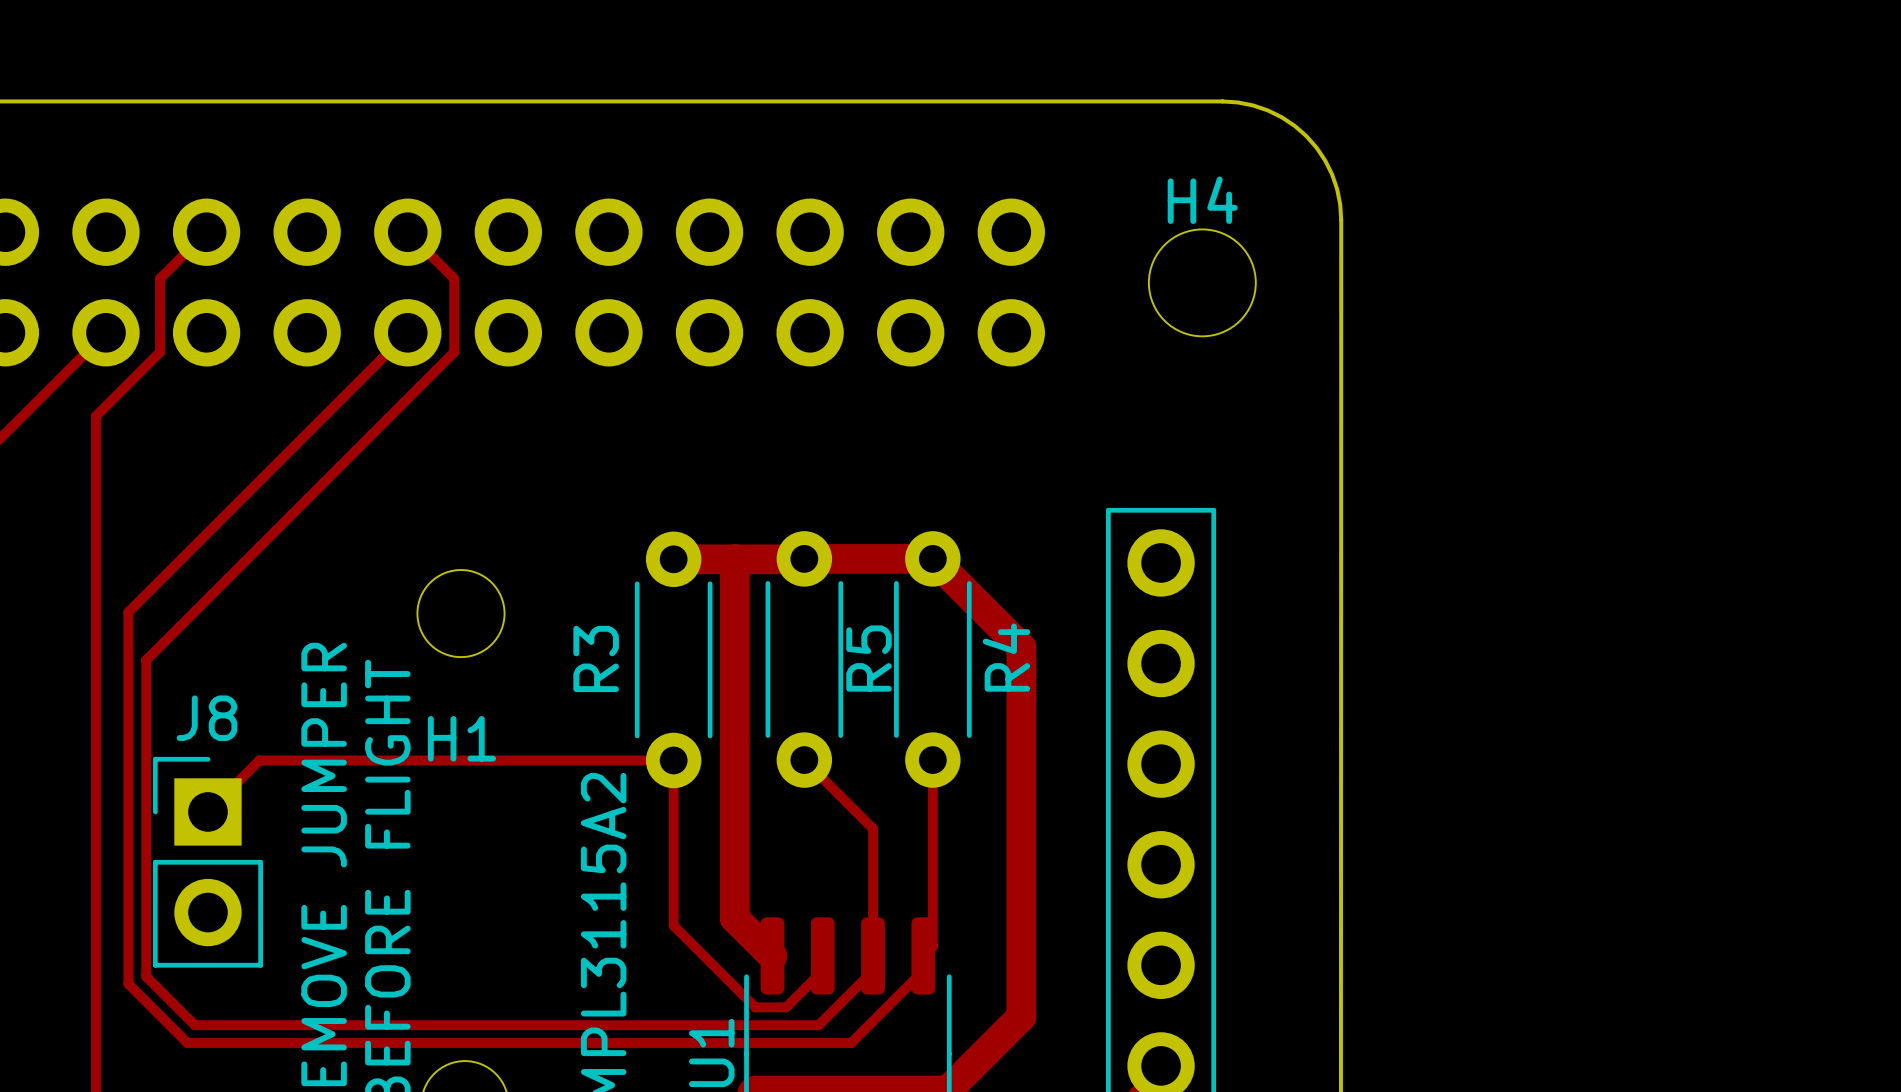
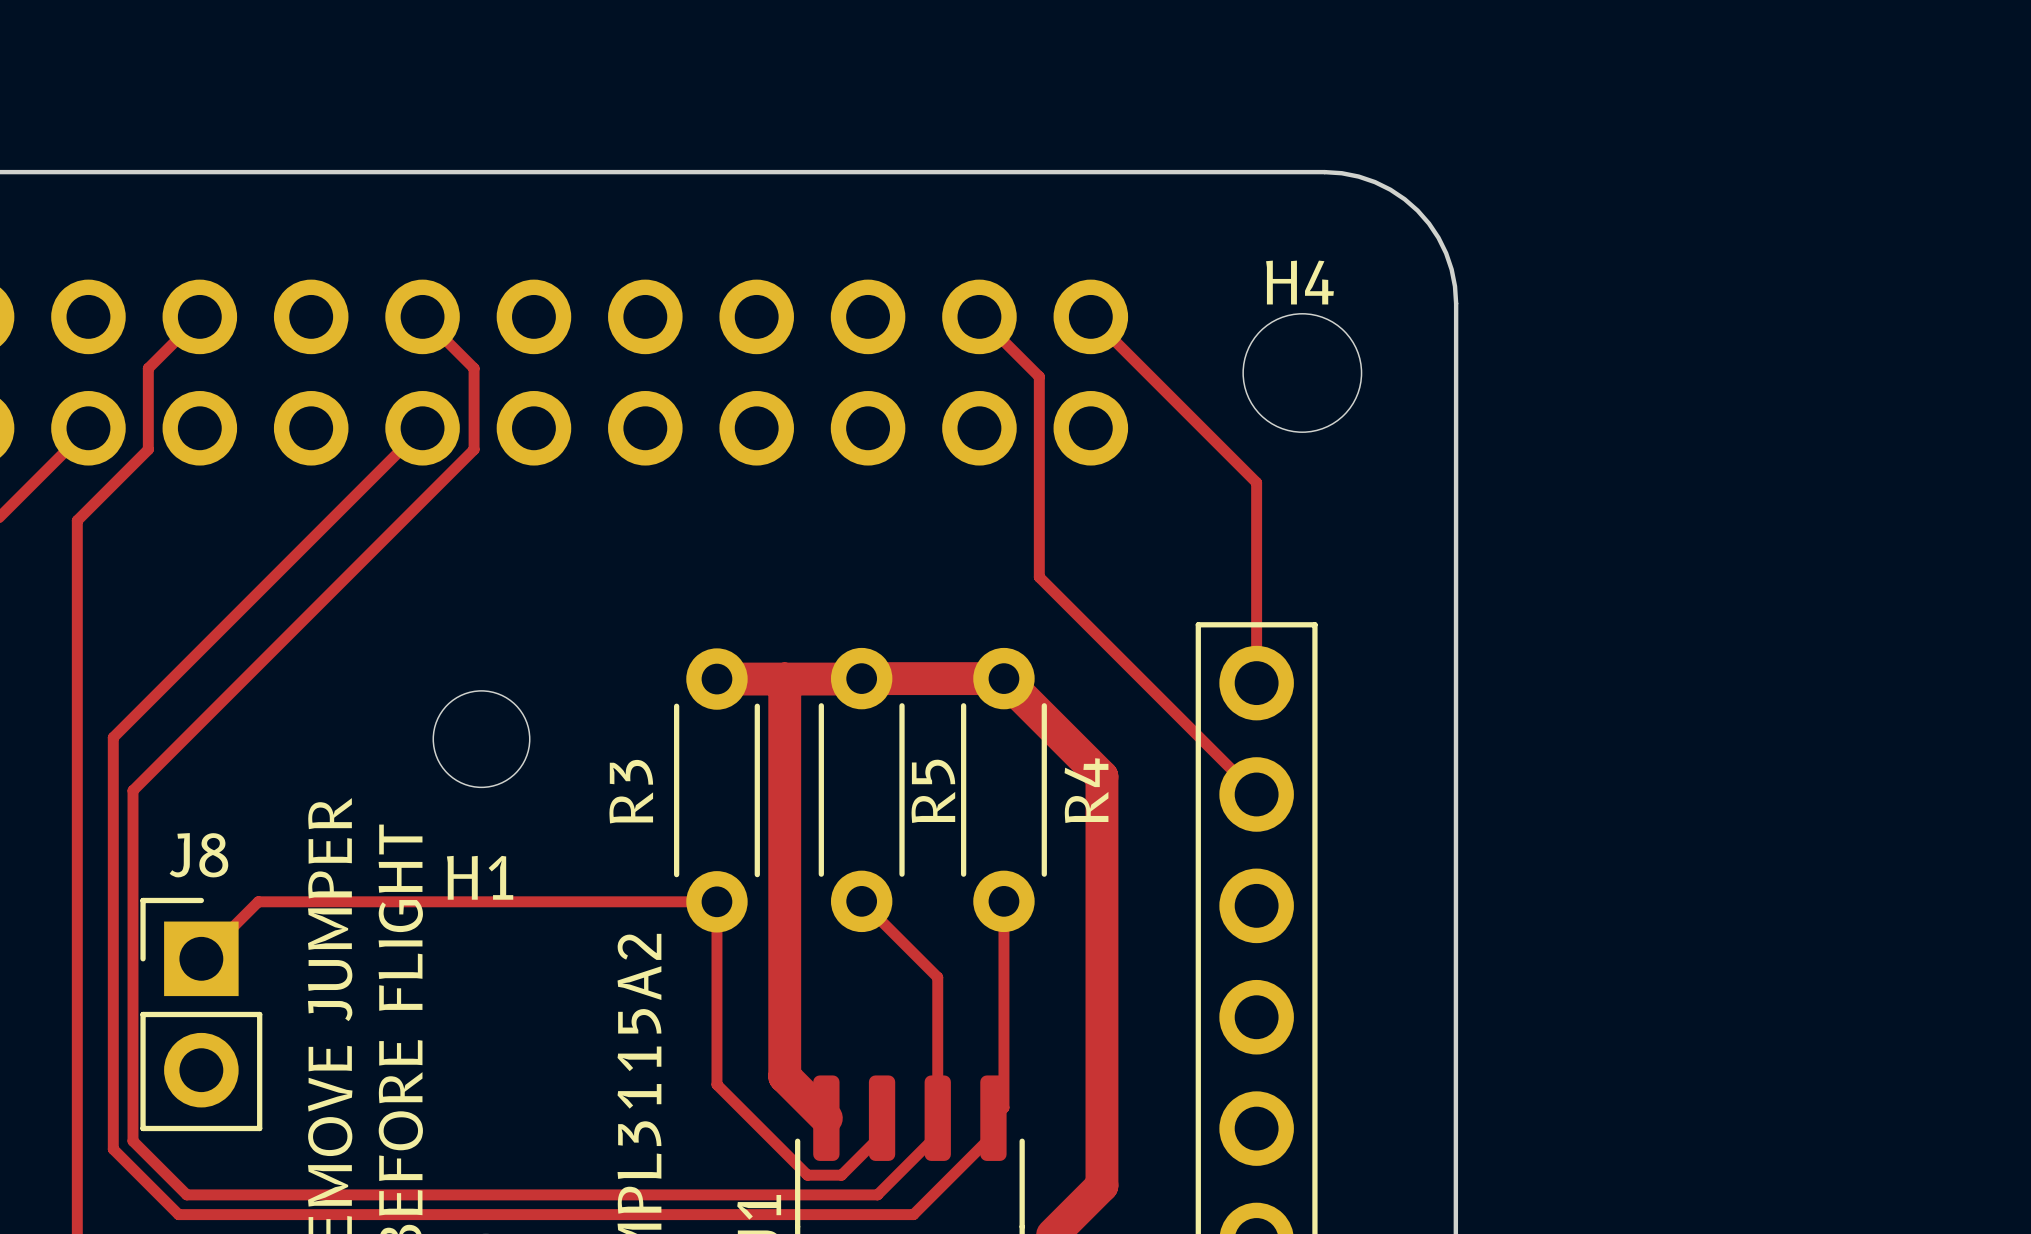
track: none -> (979, 316) (1039, 376) (1039, 577) (1256, 794)
track: none -> (1090, 316) (1256, 482) (1256, 683)

